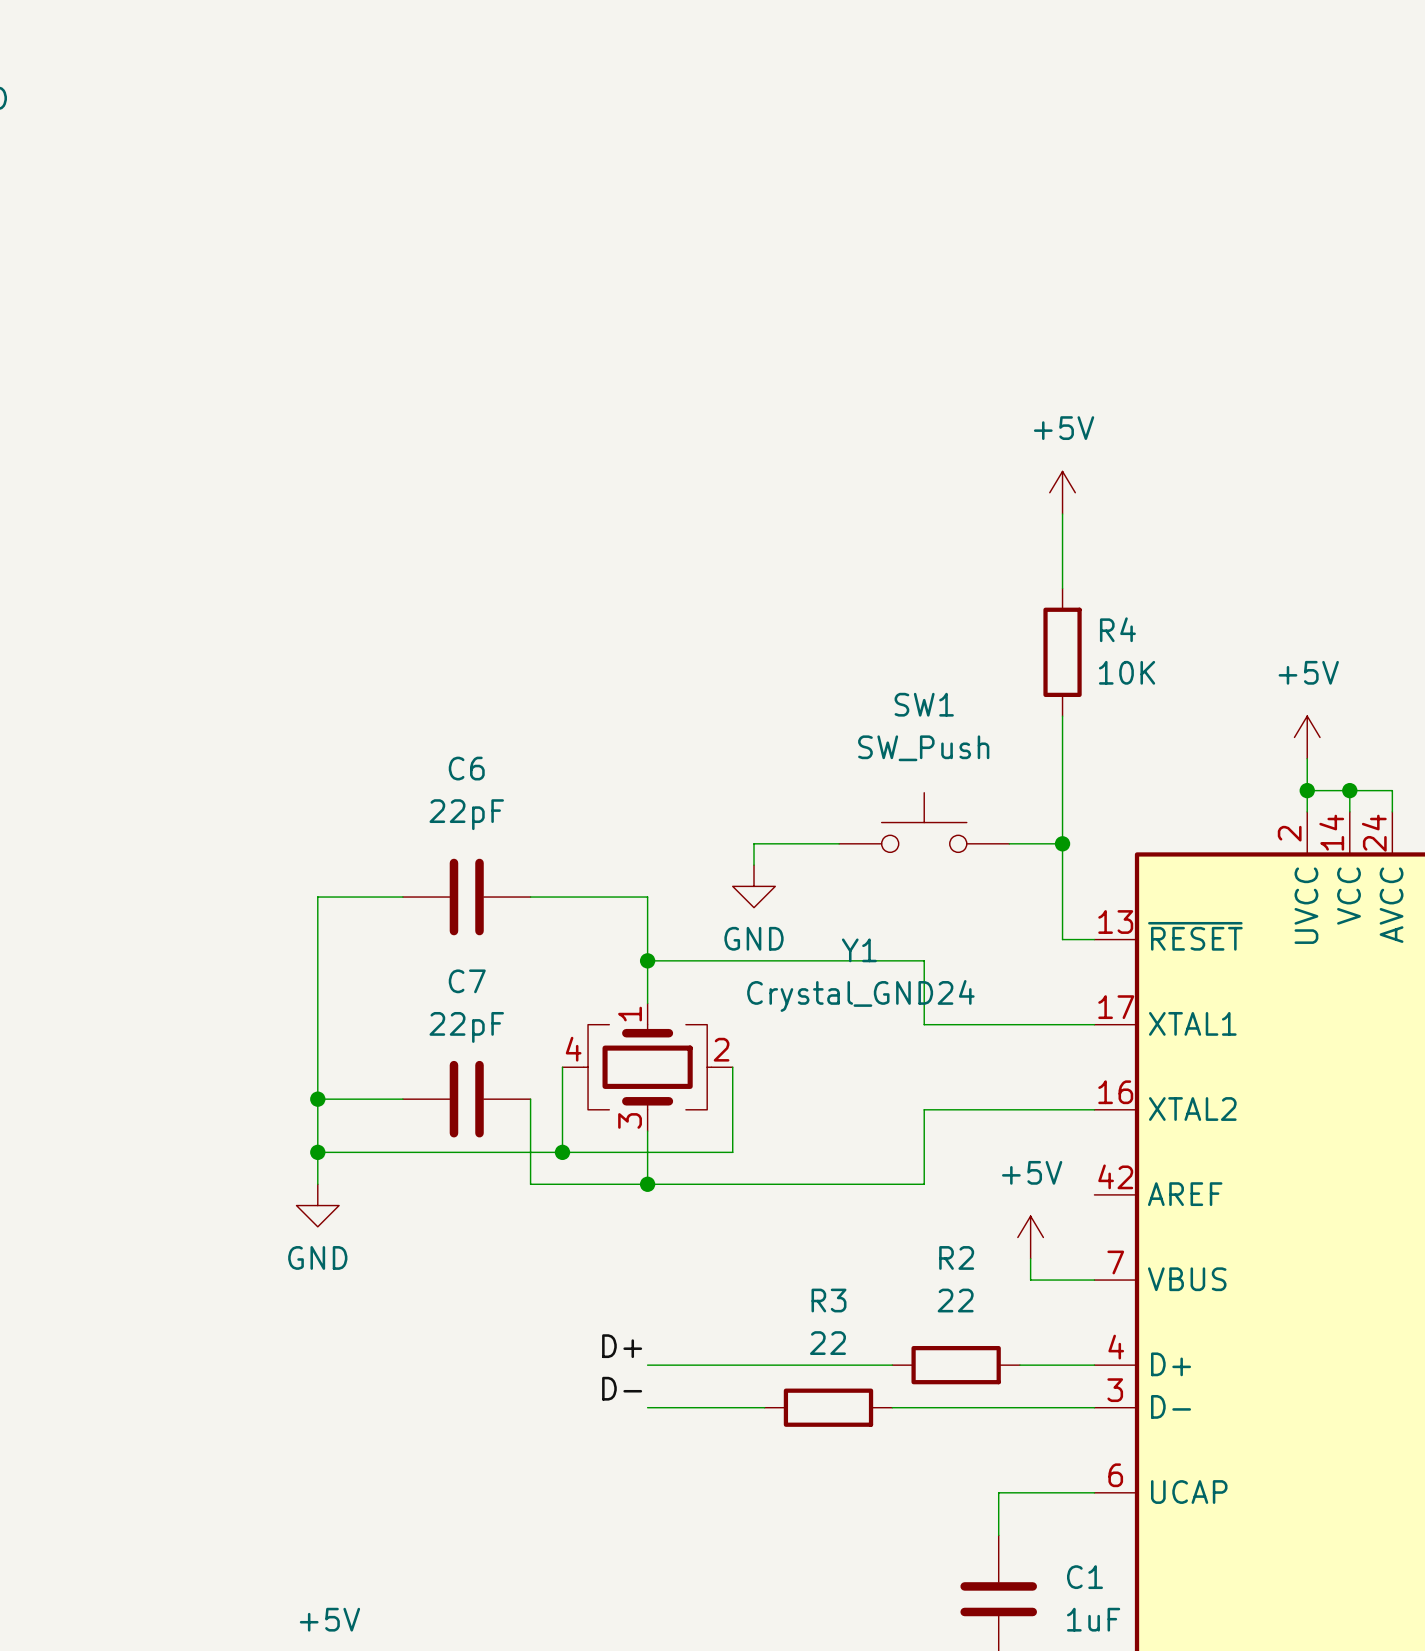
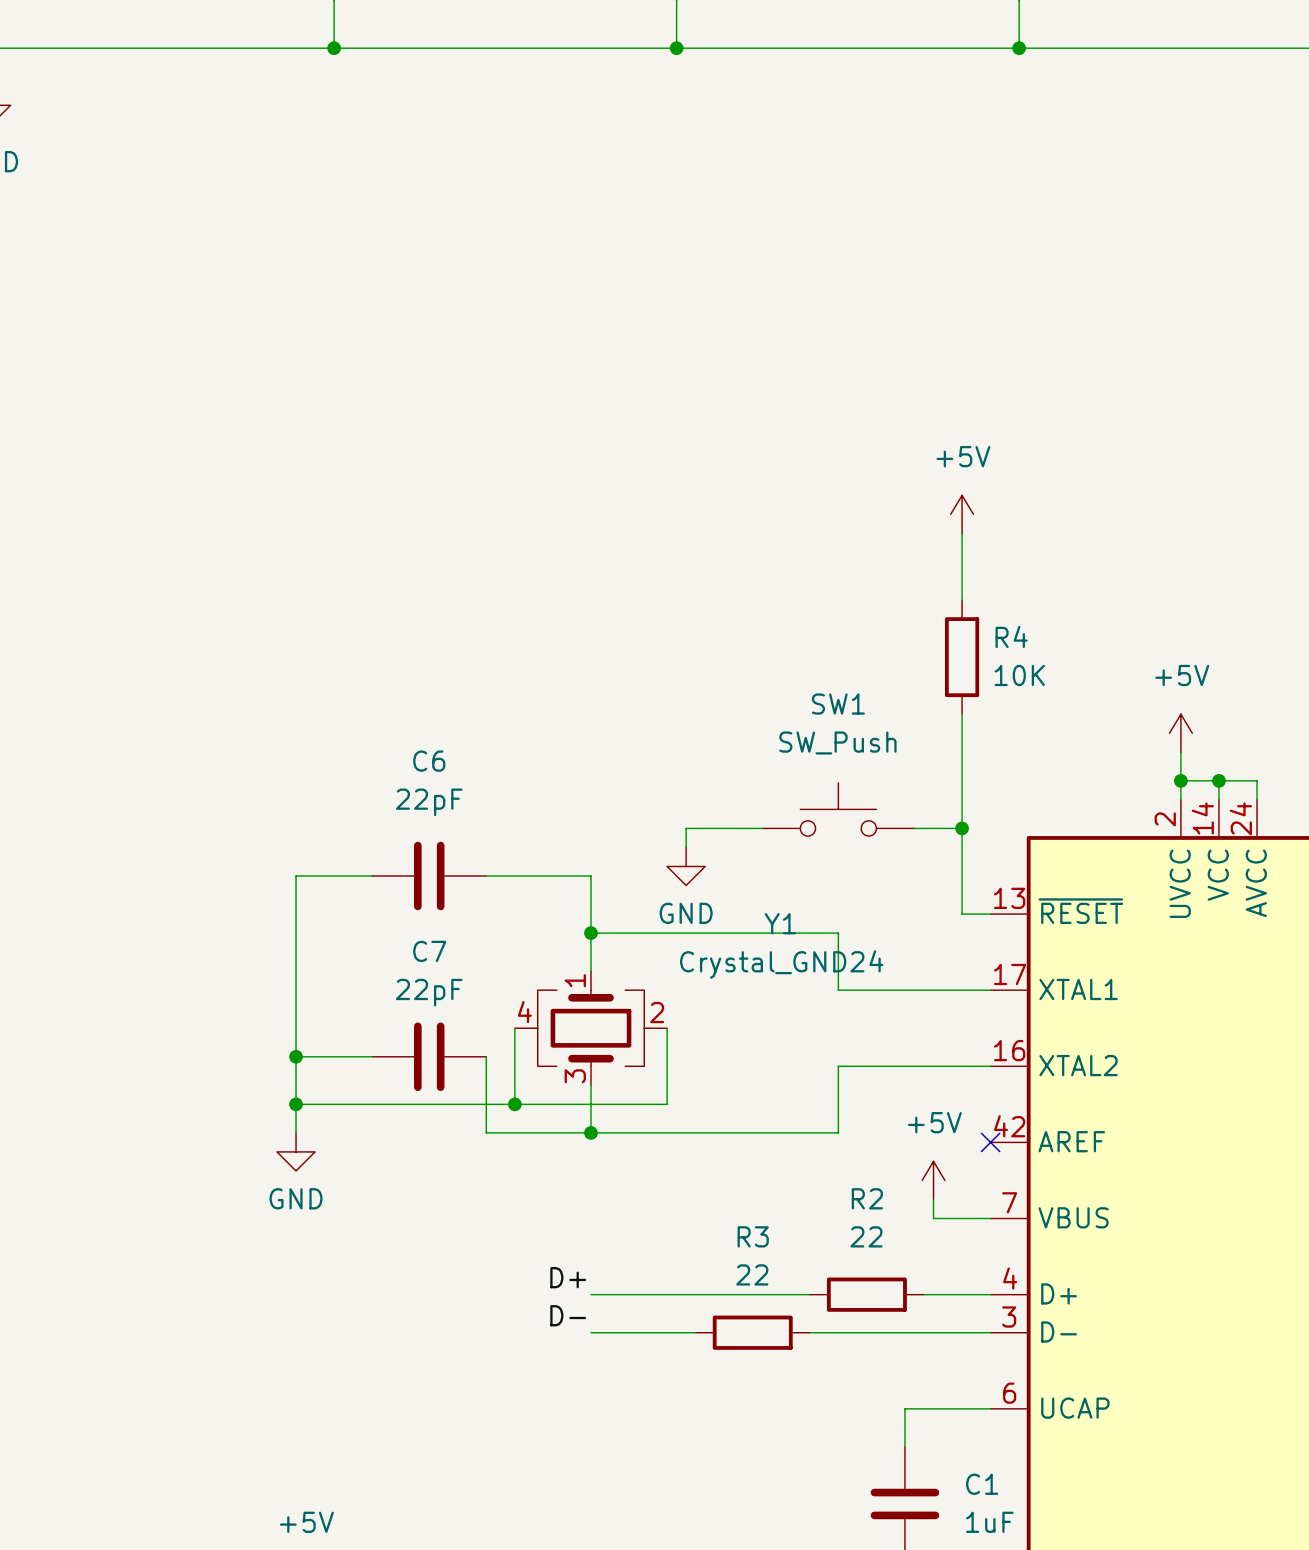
no-connect mark: none -> (990, 1142)

